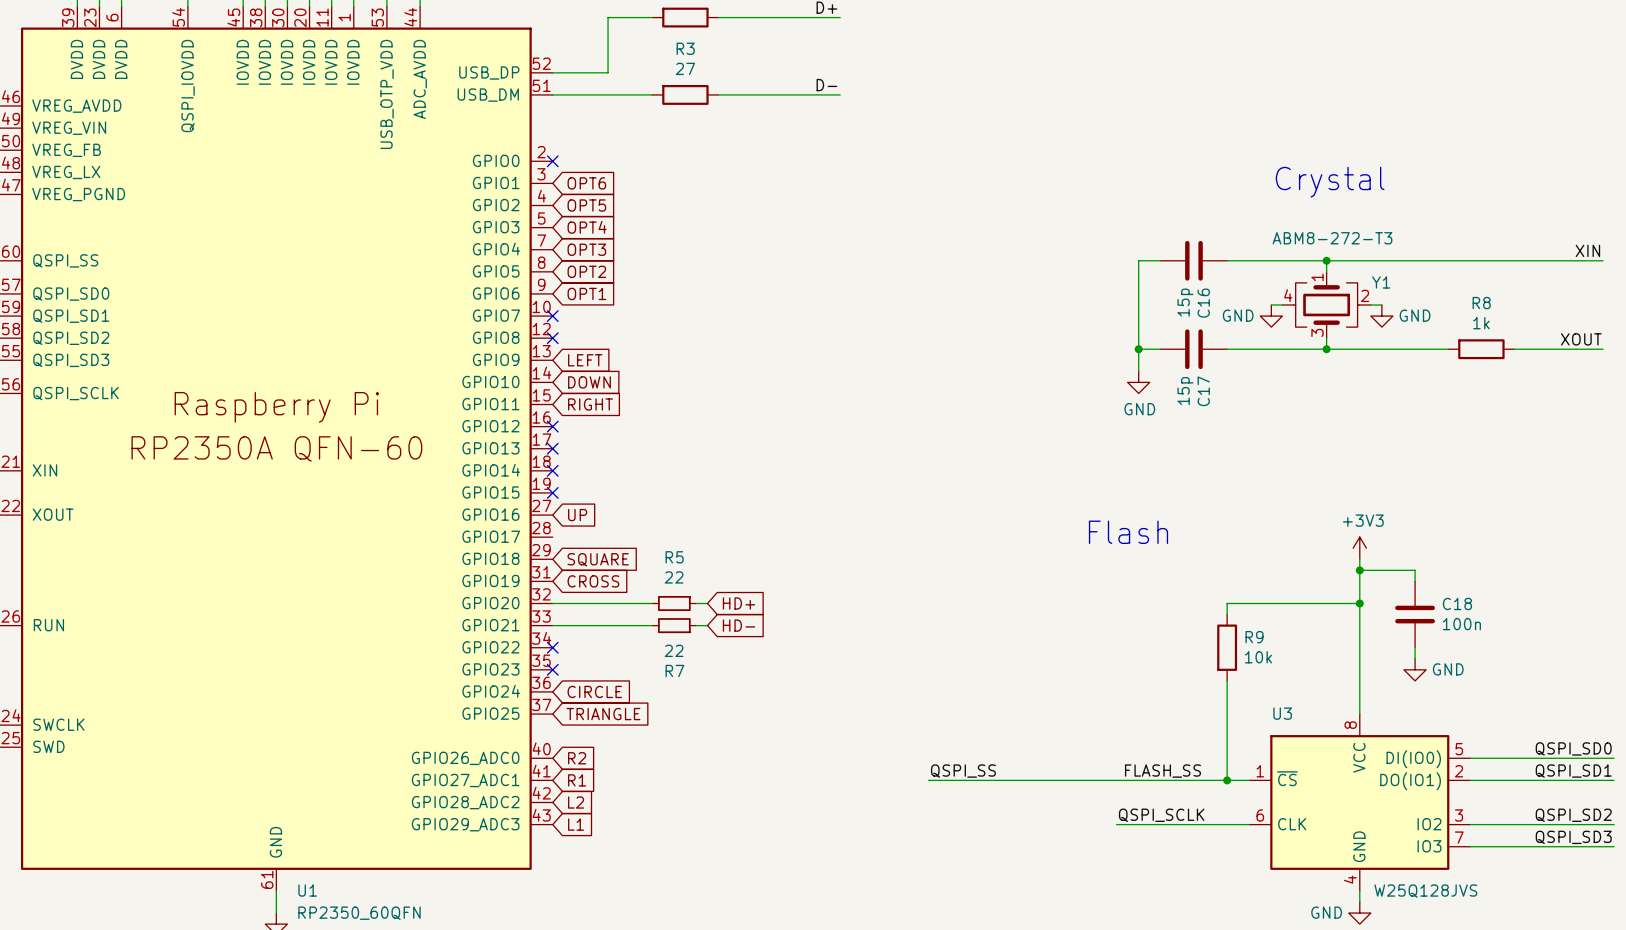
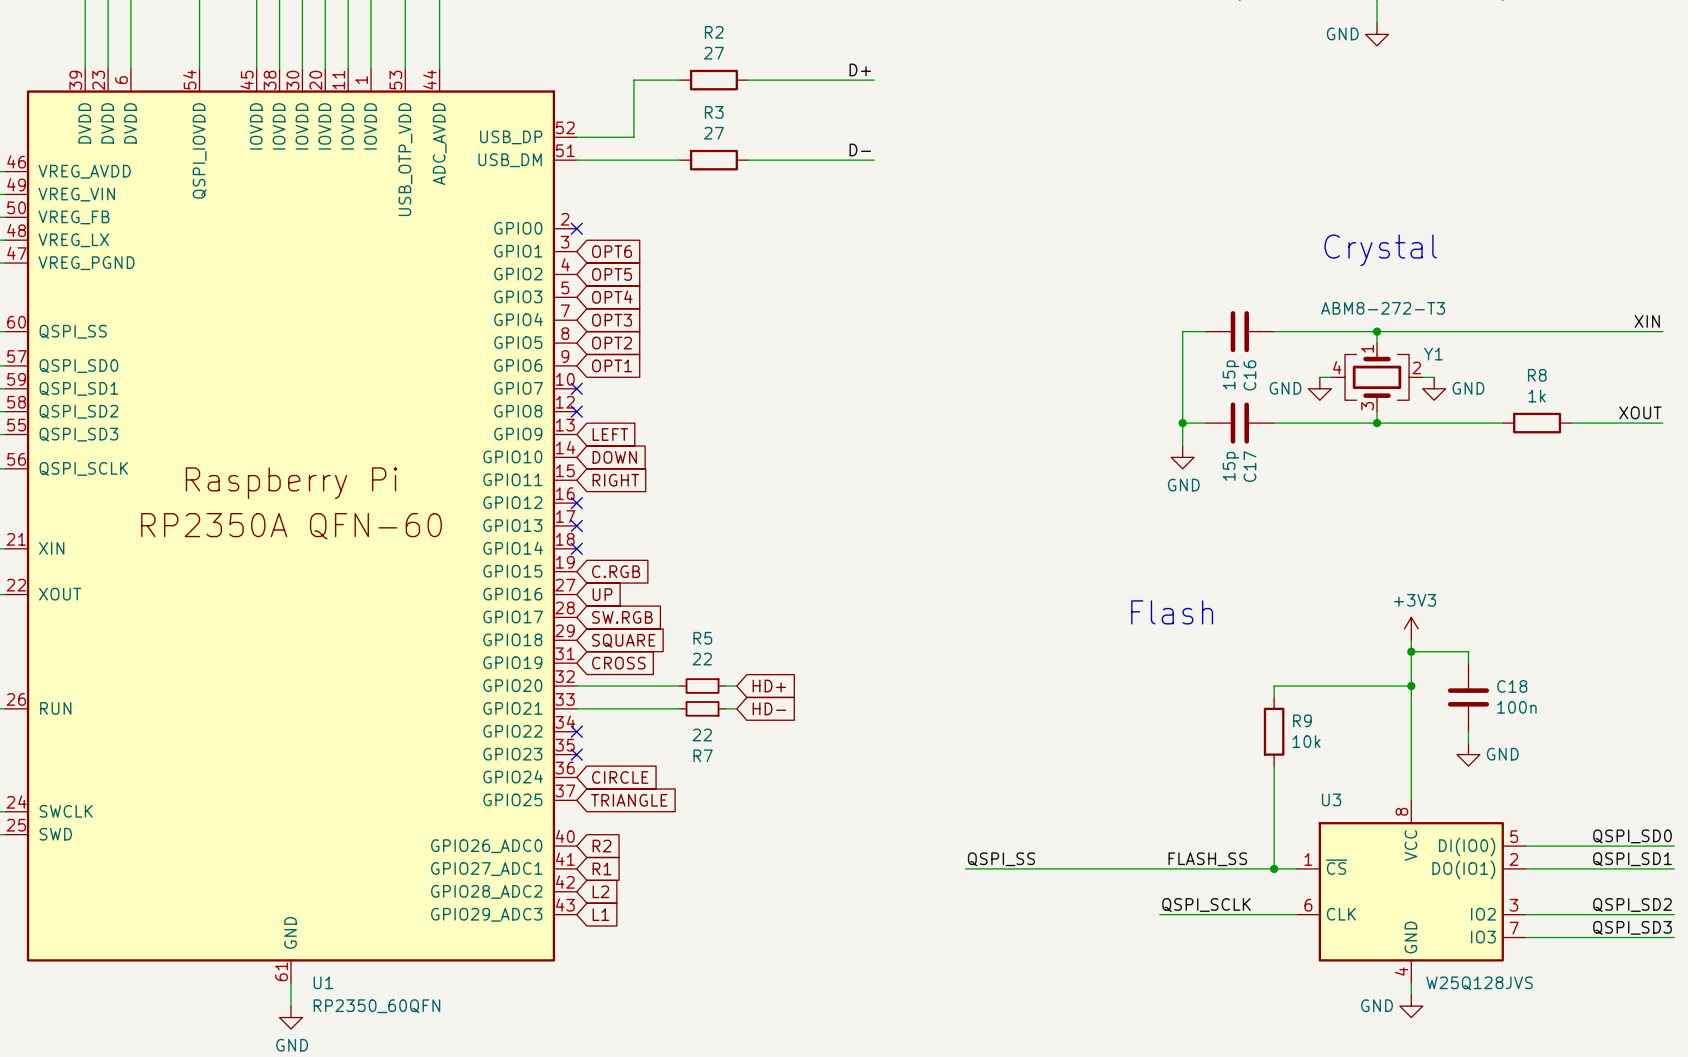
no-connect mark: (552, 492) -> none
global label: none -> C.RGB (616, 571)
global label: none -> SW.RGB (622, 617)

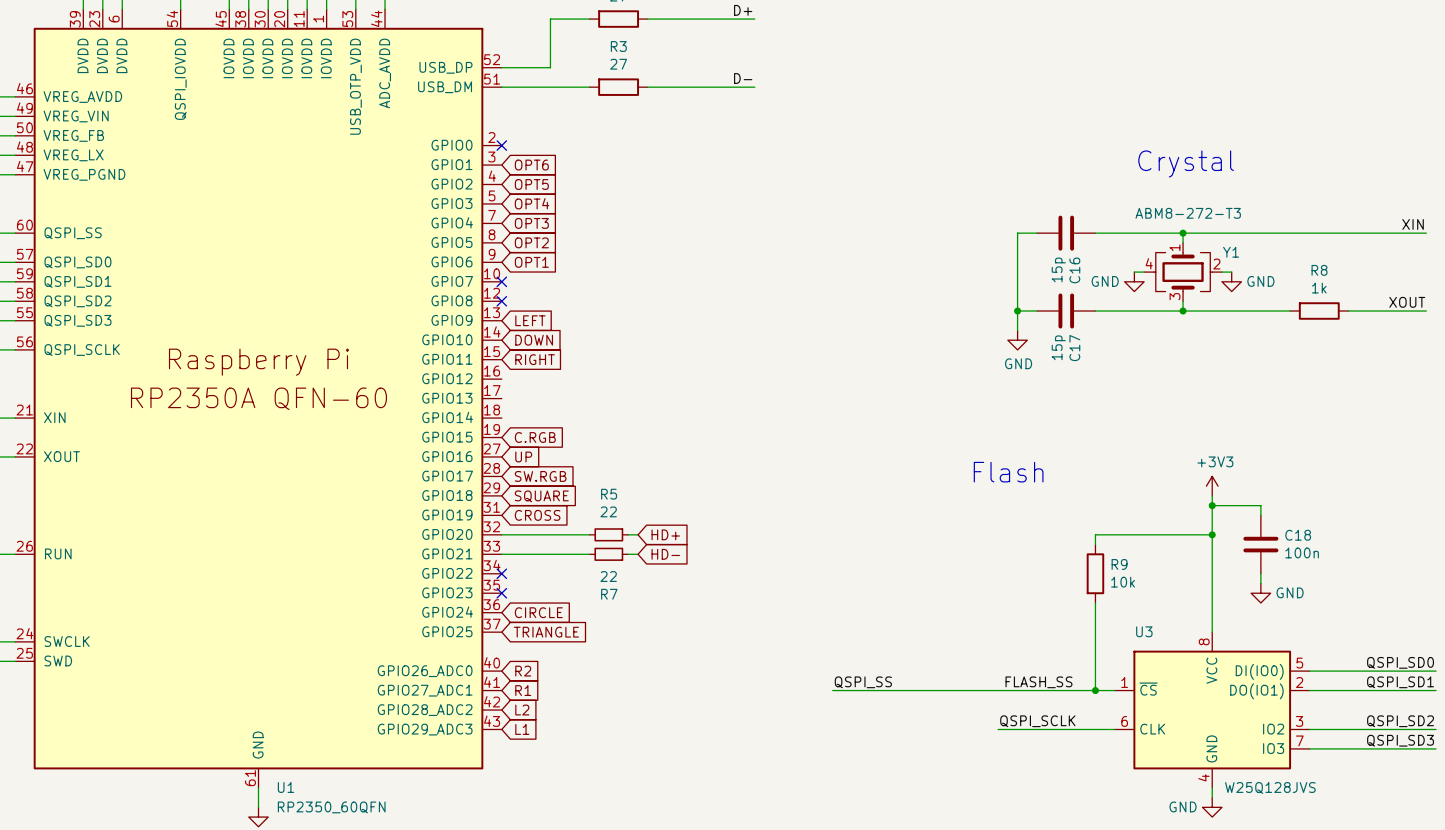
no-connect mark: (576, 503) -> none
no-connect mark: (576, 525) -> none
no-connect mark: (576, 548) -> none

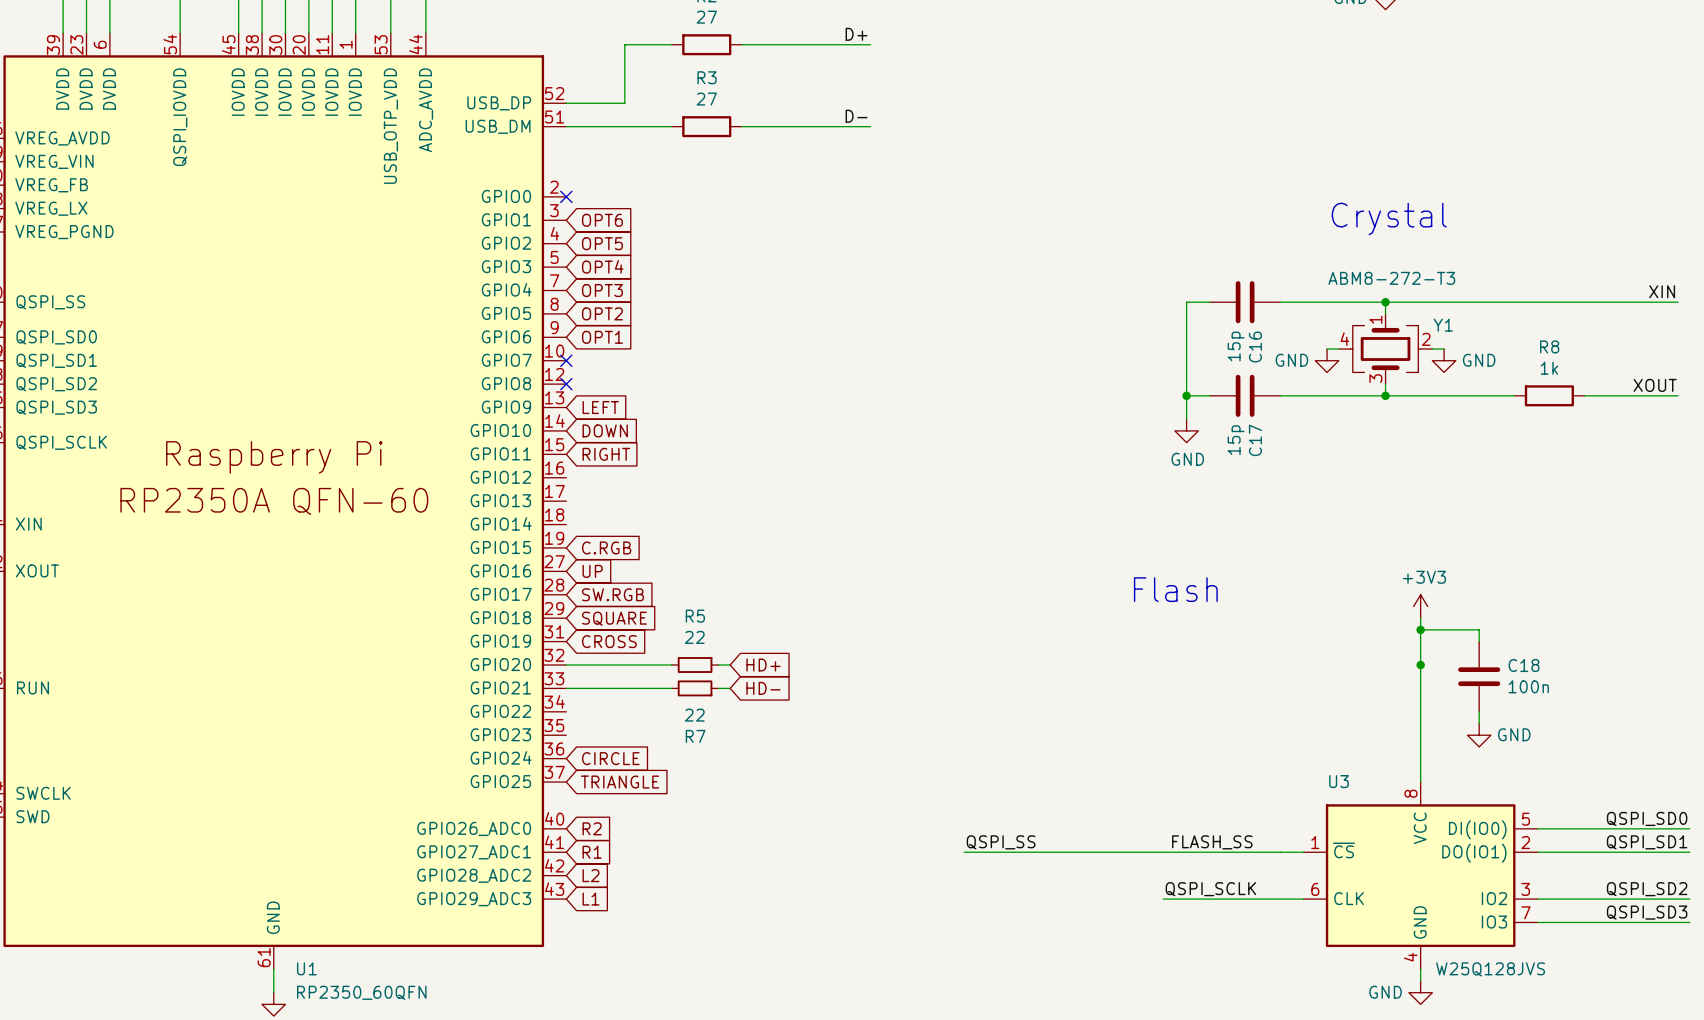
wire: (1212, 534) (1095, 534) (1095, 544) -> none
no-connect mark: (501, 573) -> none
R9: 10k (1095, 573) -> none
no-connect mark: (501, 593) -> none
wire: (1095, 602) (1095, 690) -> none
junction: (1095, 690) -> none

